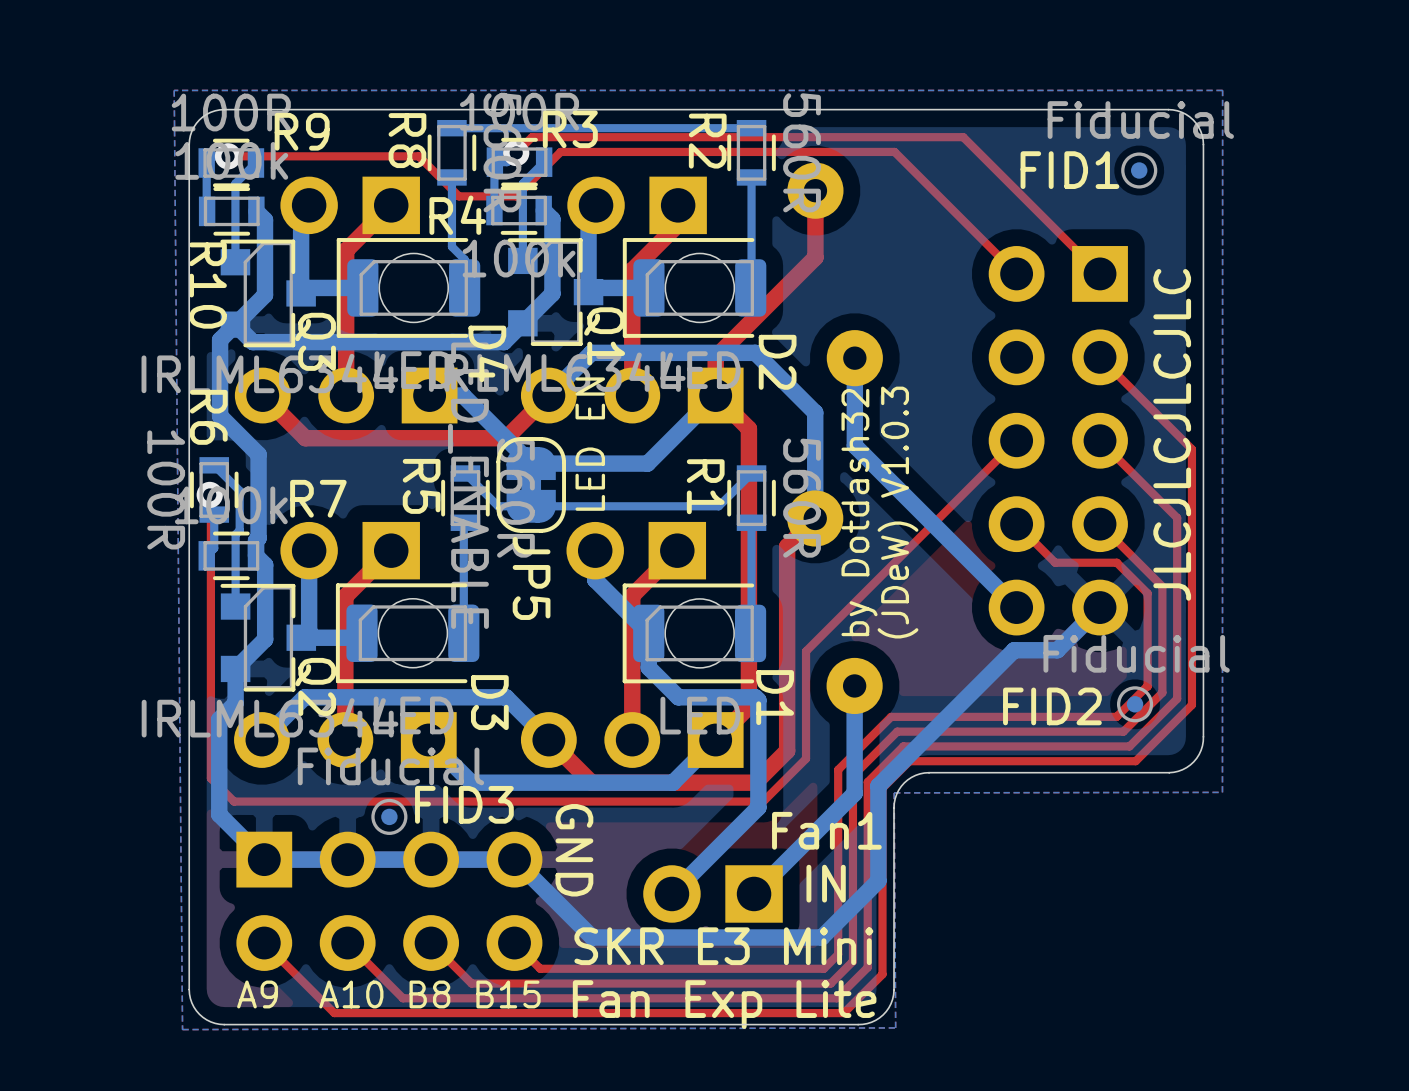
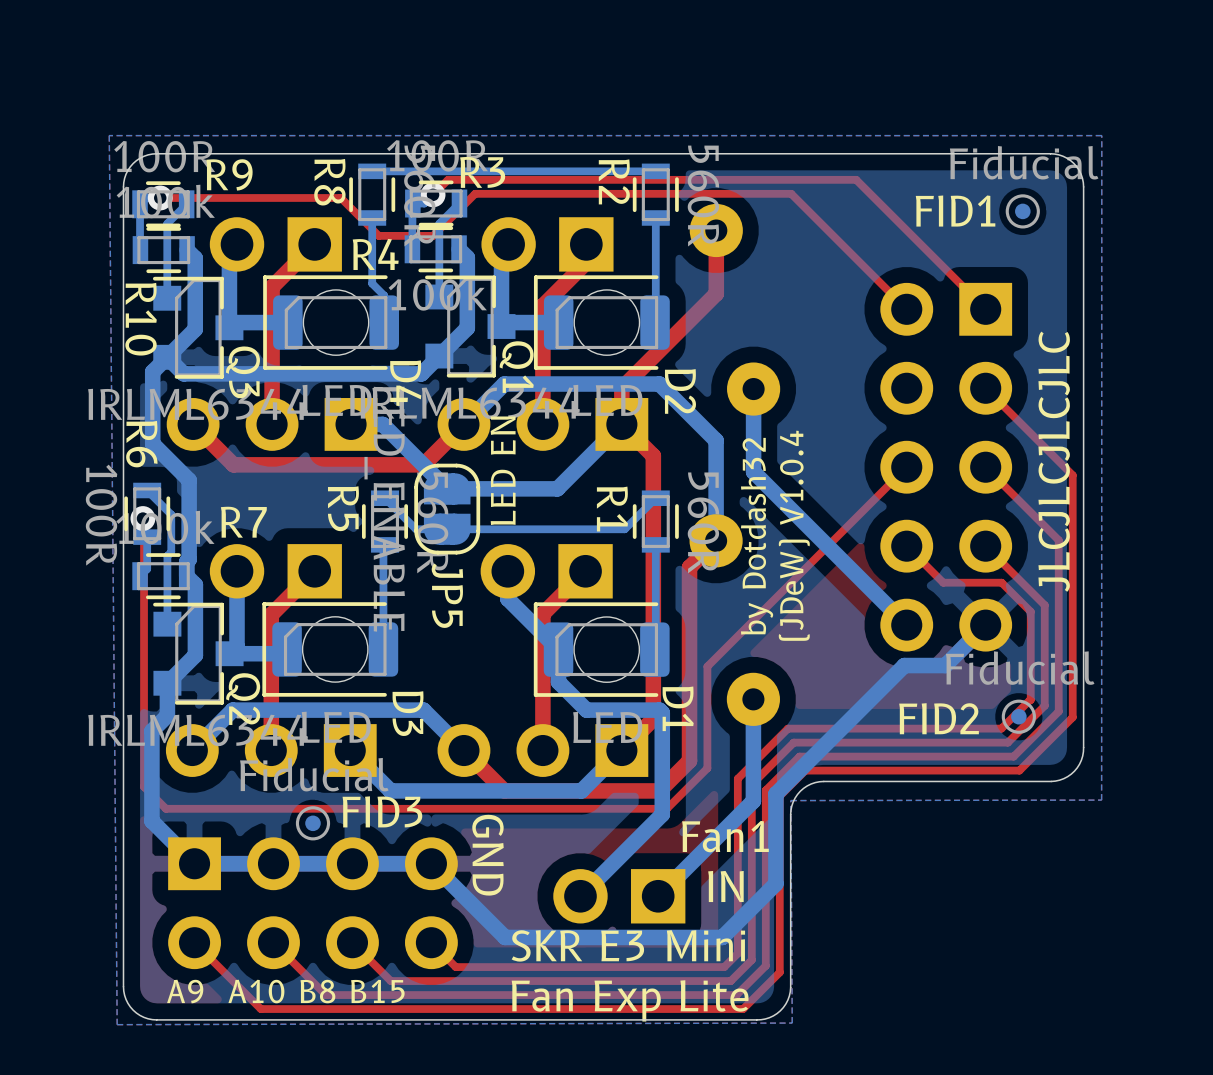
JP5 footprint: [496, 437, 566, 533] -> [414, 463, 481, 555]
text: (JDeW) V1.0.3 (897, 512) -> (JDeW) V1.0.4 (794, 535)

